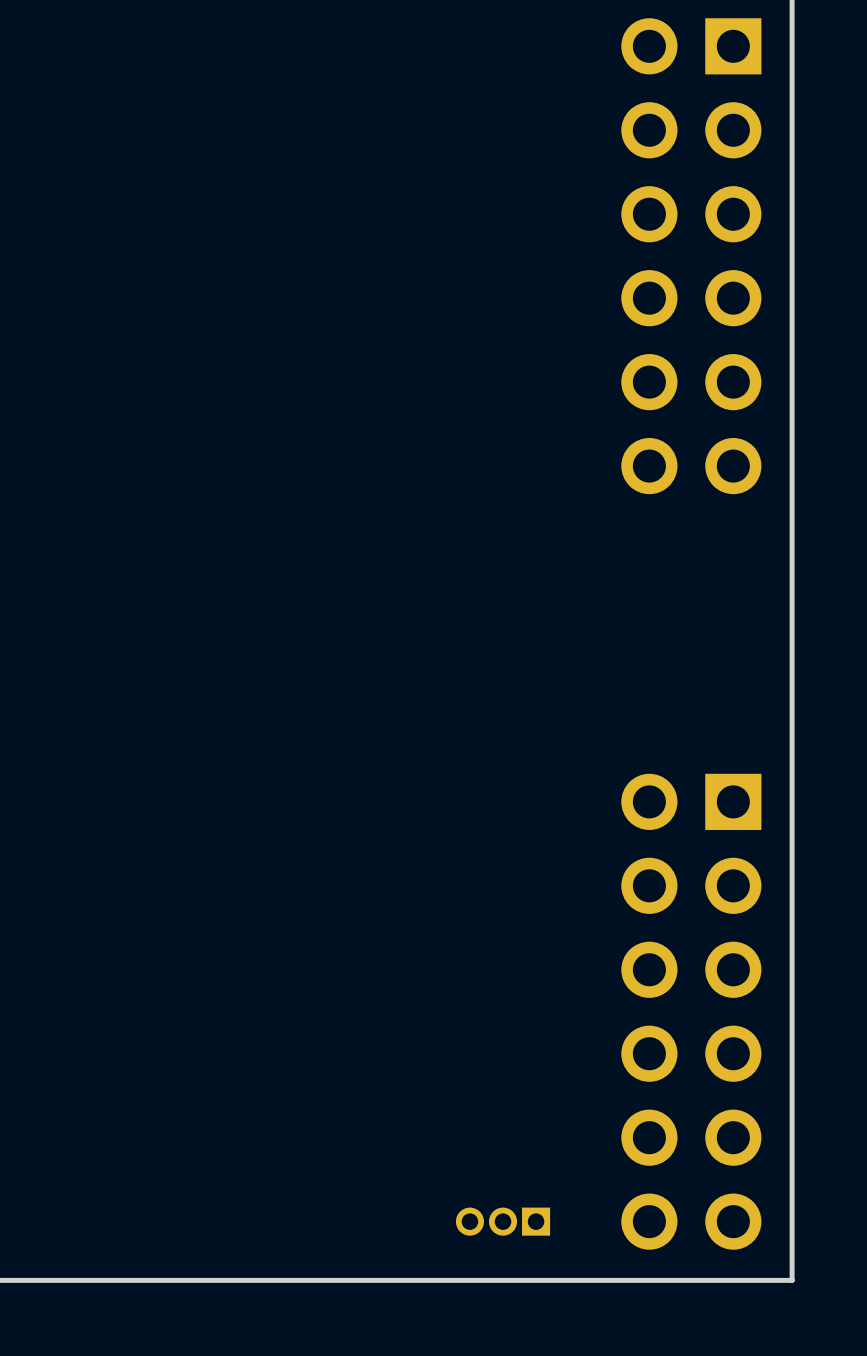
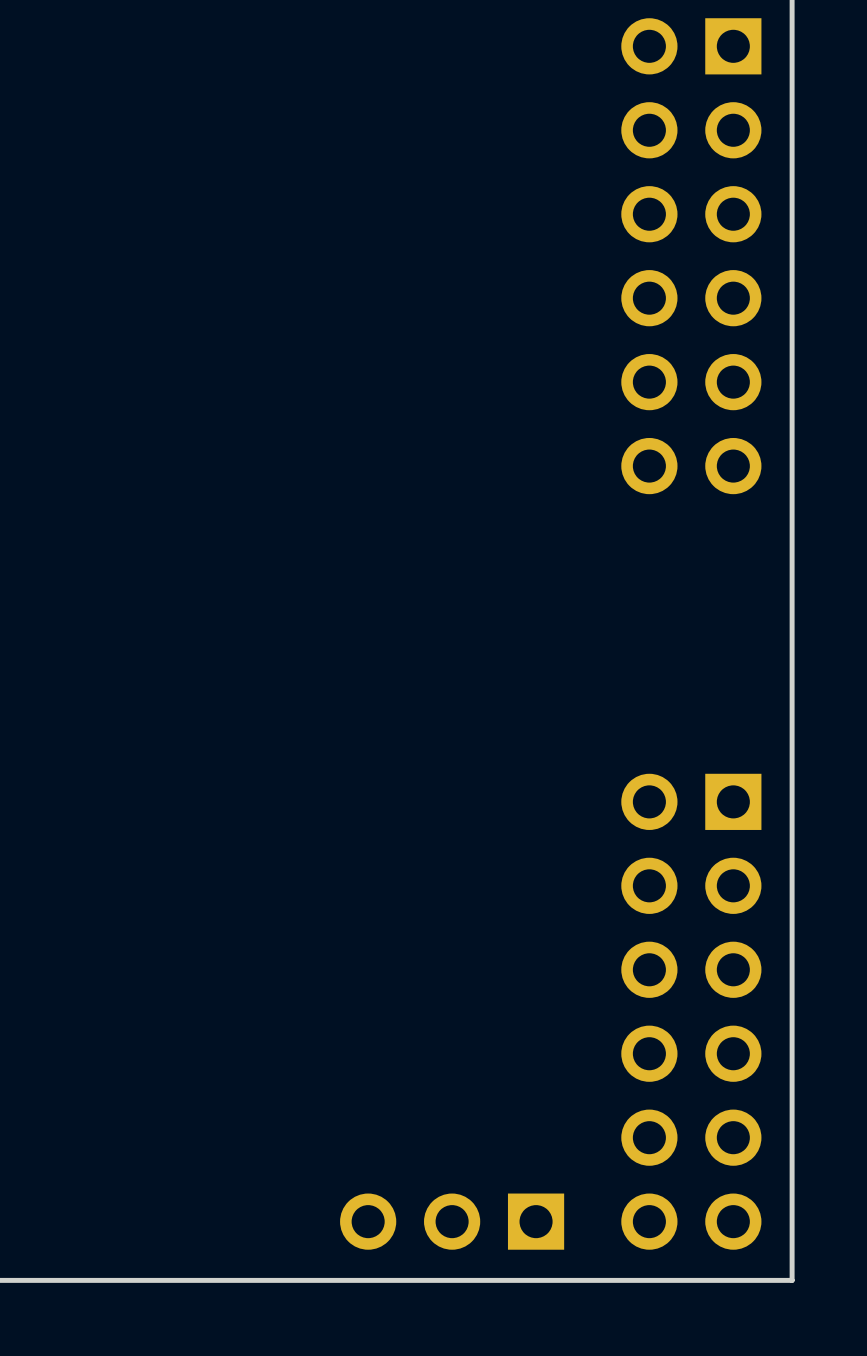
part: none -> (452, 1221)
part: (503, 1221) -> none

